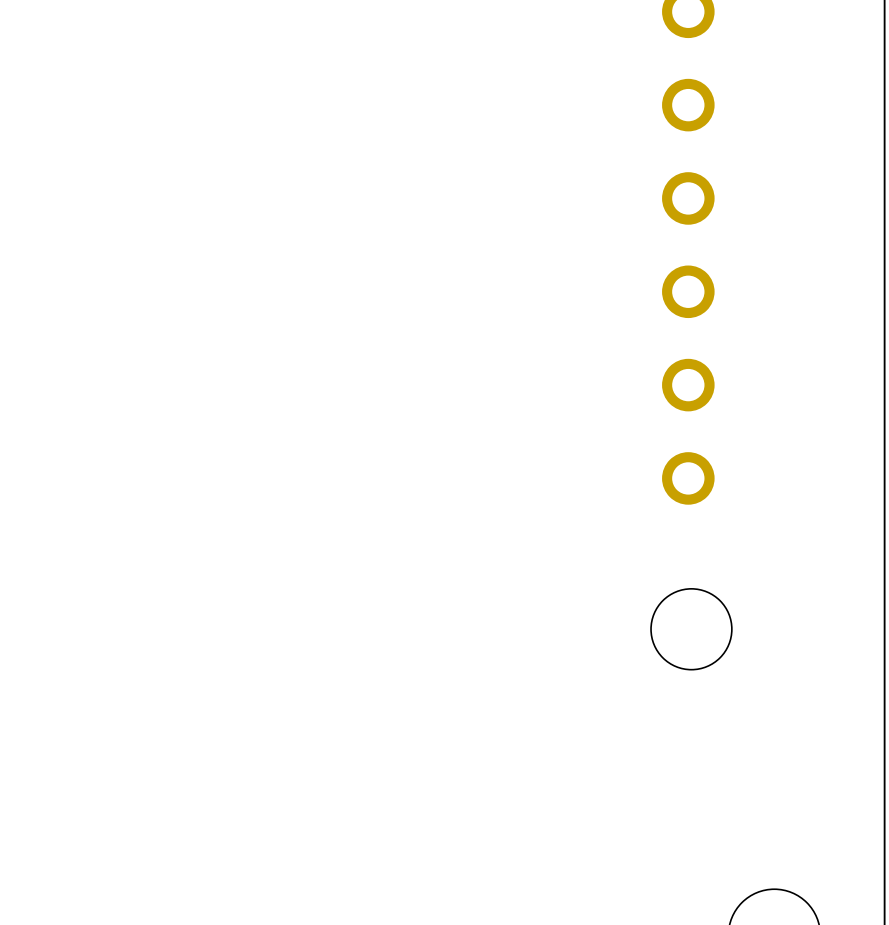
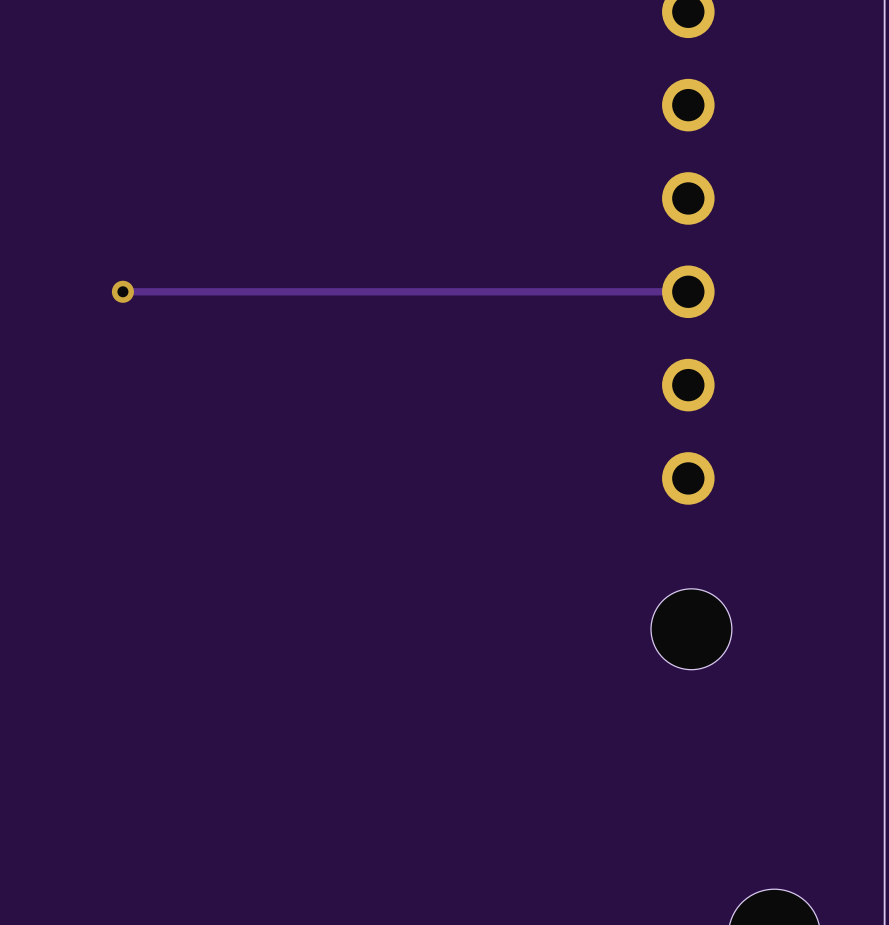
via: none -> (122, 291)
track: none -> (688, 291) (122, 291)

